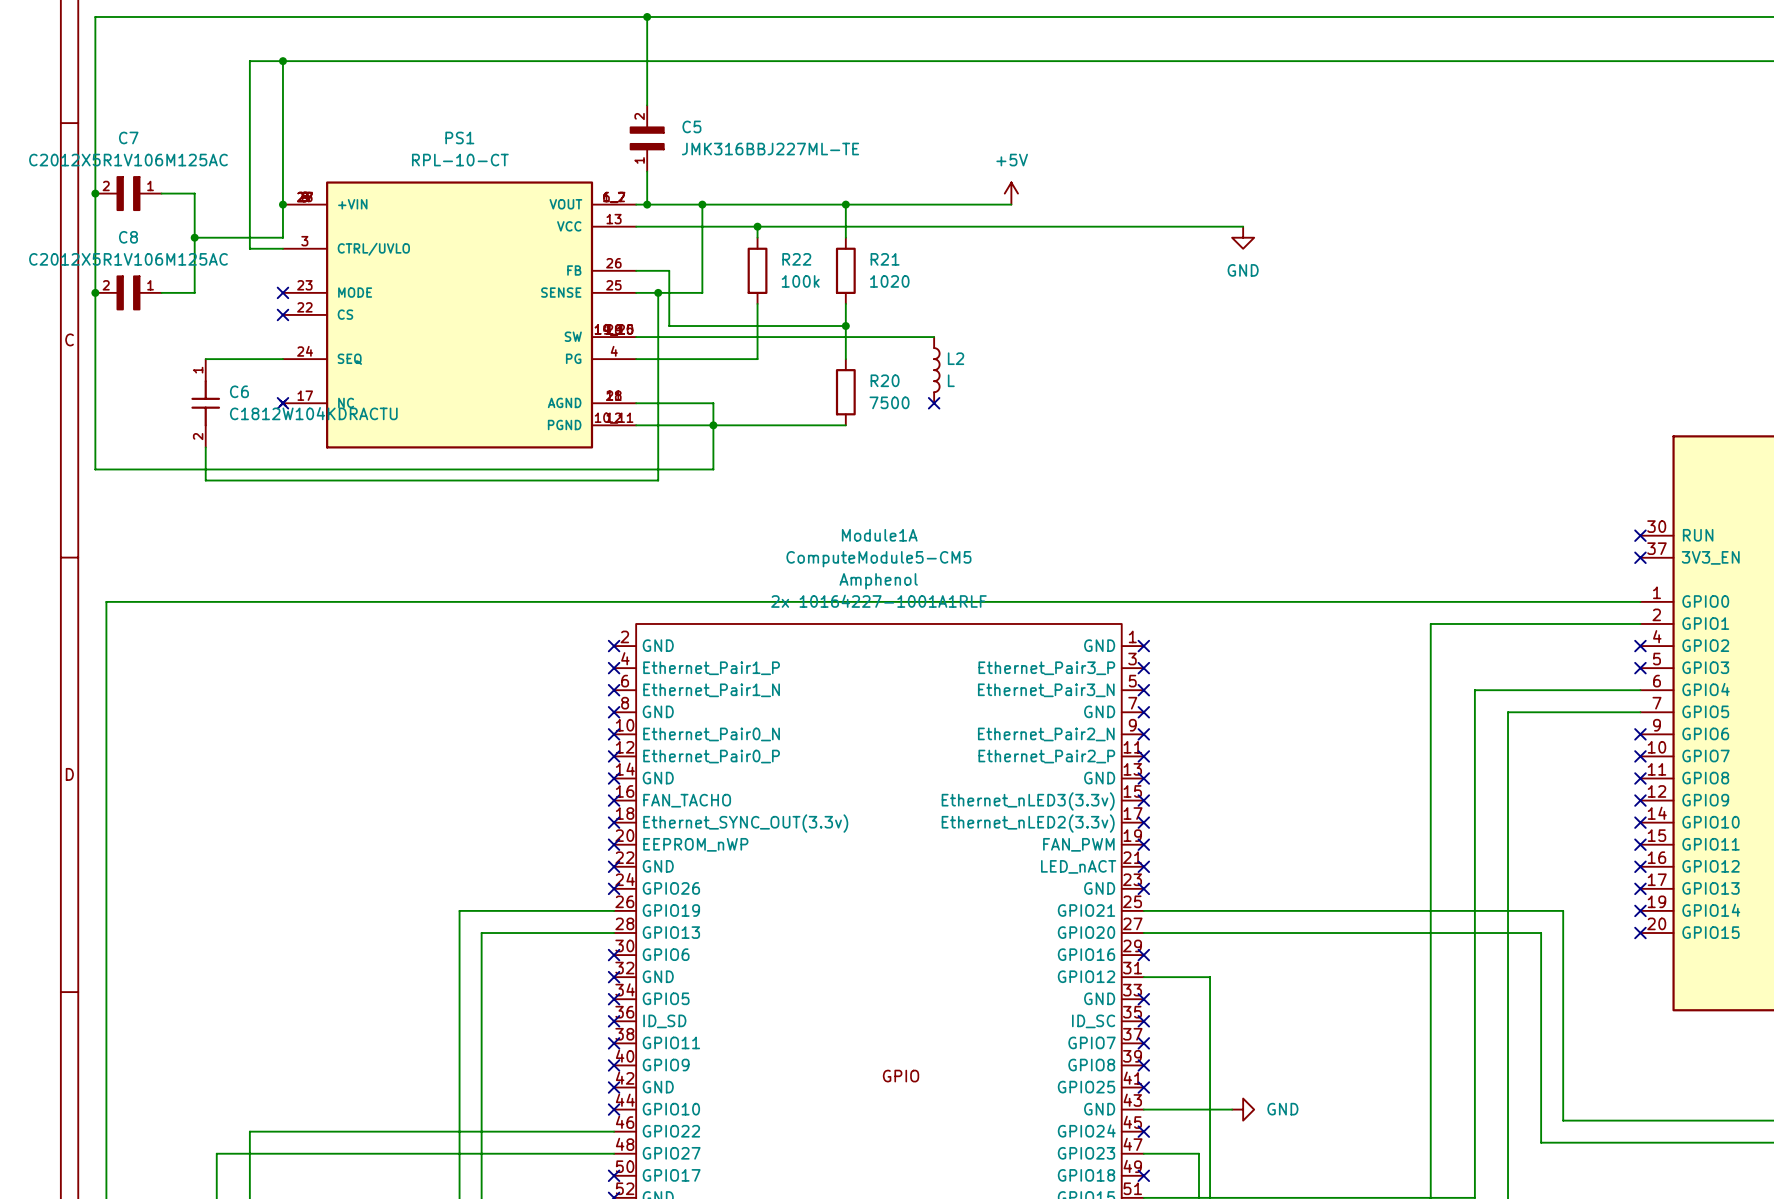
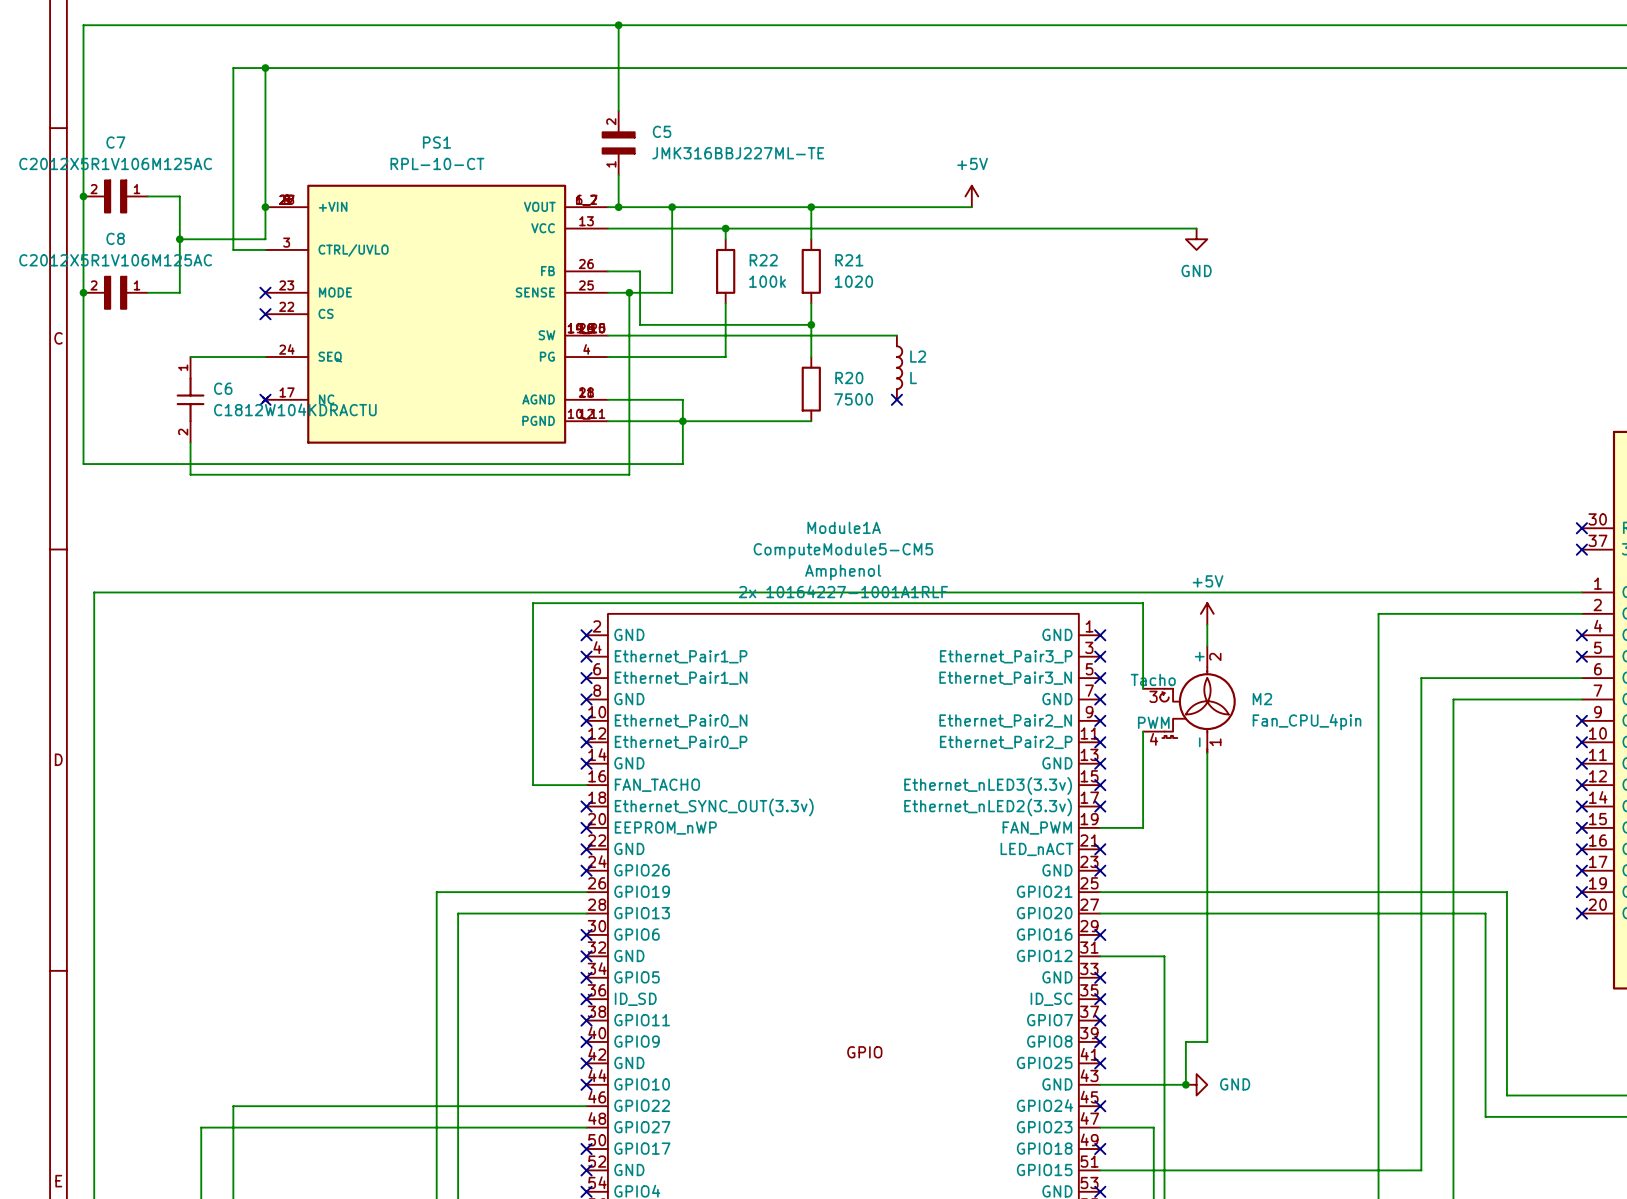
power symbol: none -> +5V (1207, 613)
wire: none -> (1207, 624) (1207, 645)
wire: none -> (1143, 688) (1143, 603) (533, 603) (533, 785) (586, 785)
M2: none -> Fan_CPU_4pin (1189, 699)
wire: none -> (1143, 731) (1143, 827) (1100, 827)
wire: none -> (1207, 753) (1207, 1041) (1185, 1041) (1185, 1084)
no-connect mark: (614, 800) -> none
no-connect mark: (1143, 844) -> none
junction: none -> (1185, 1084)

